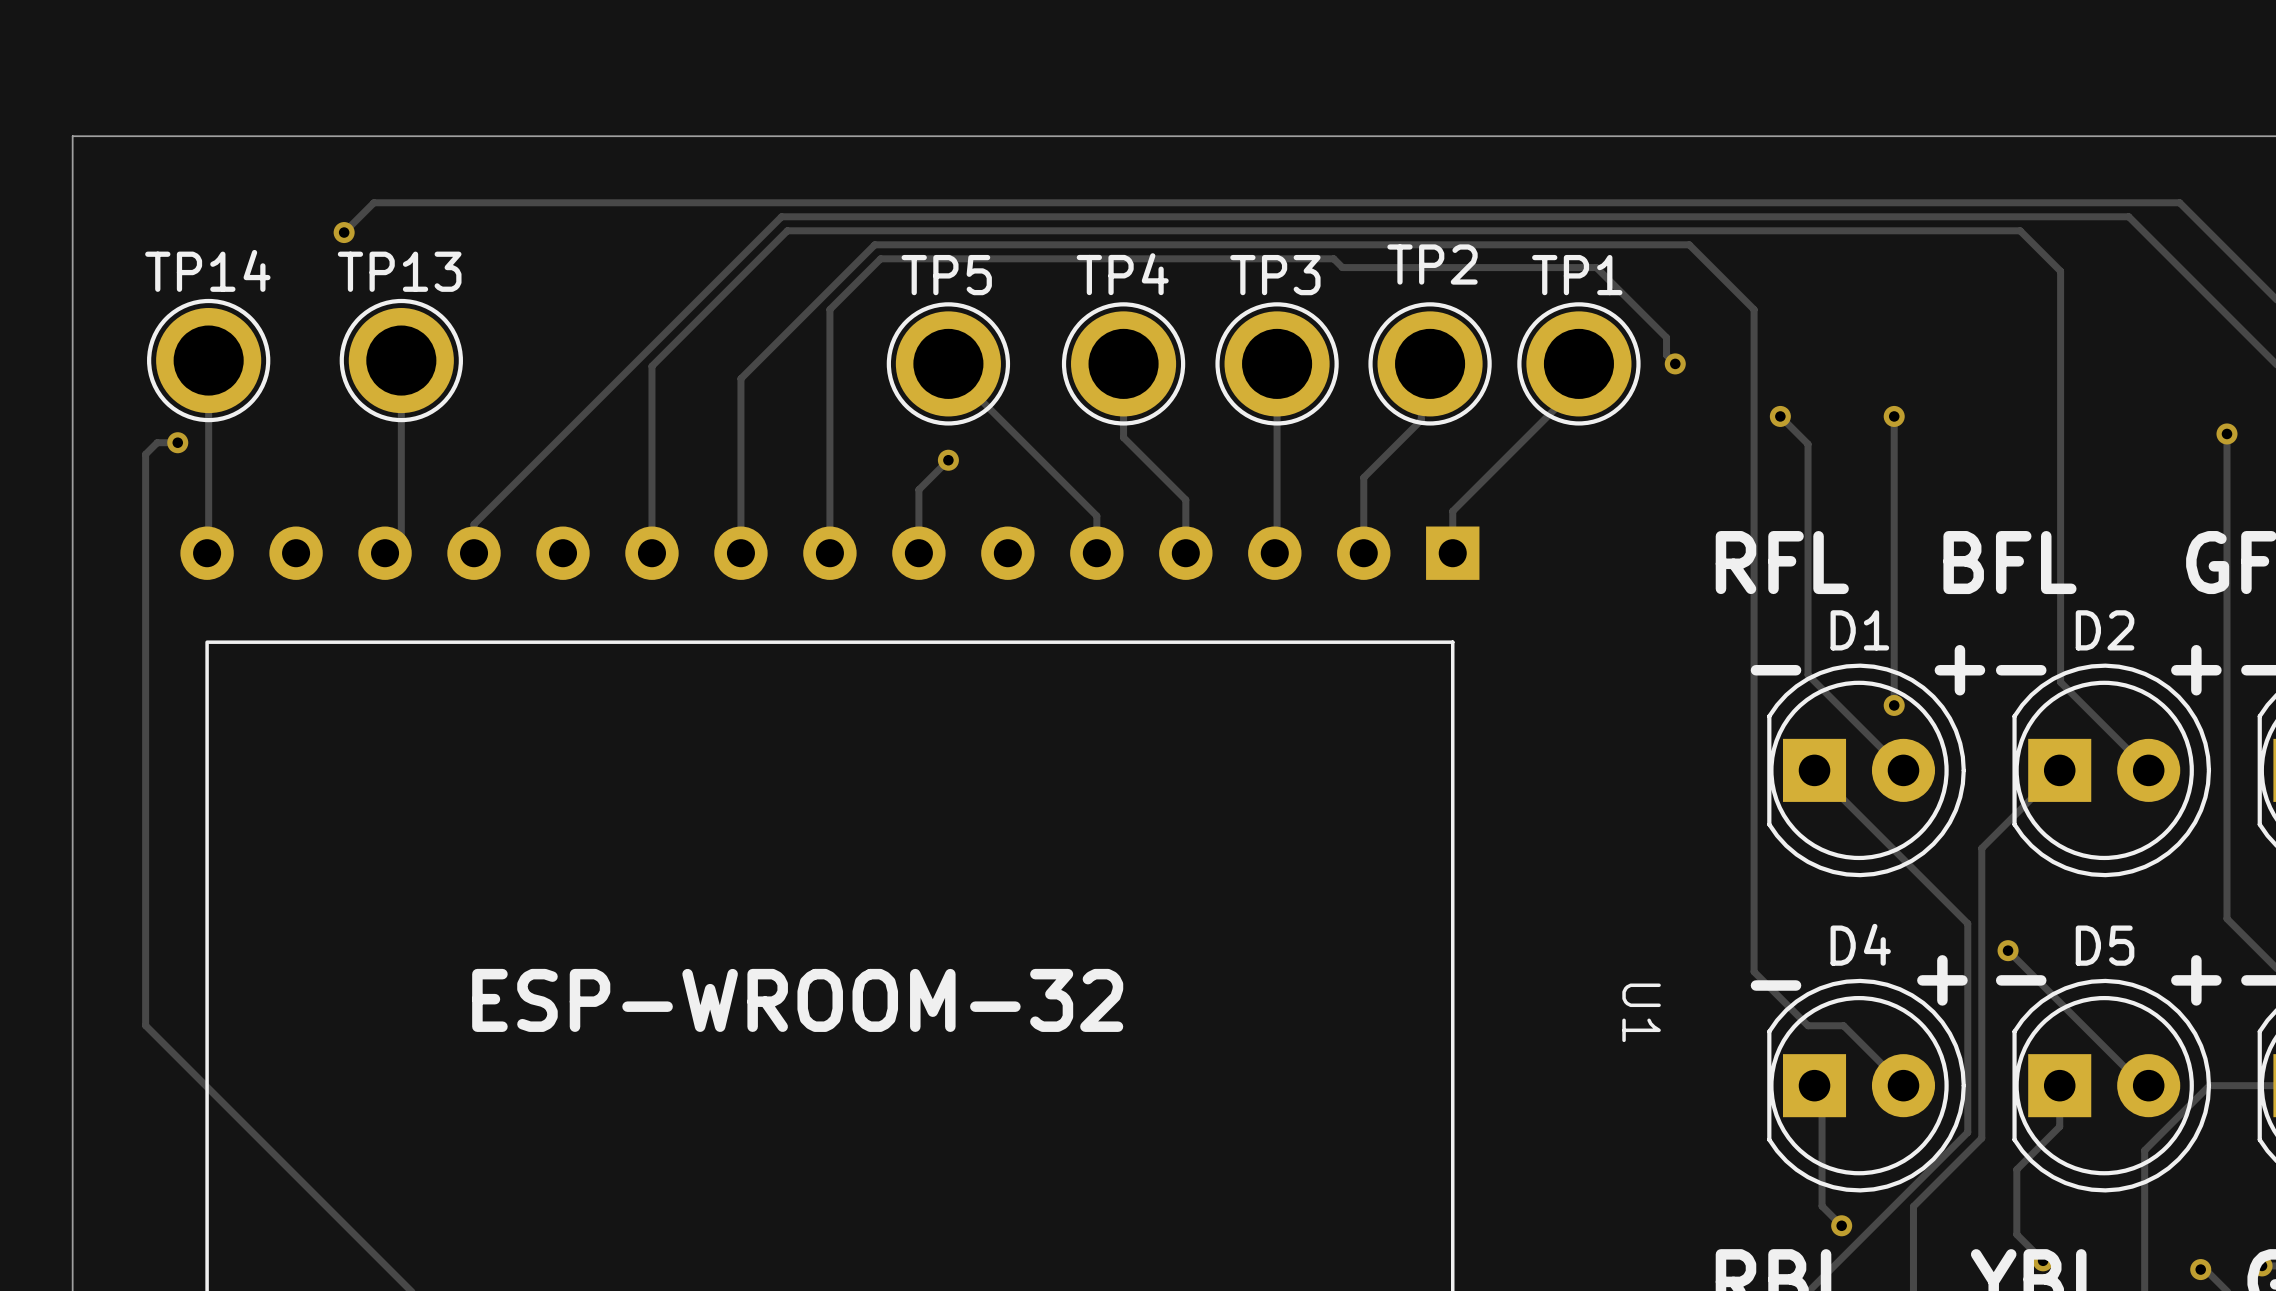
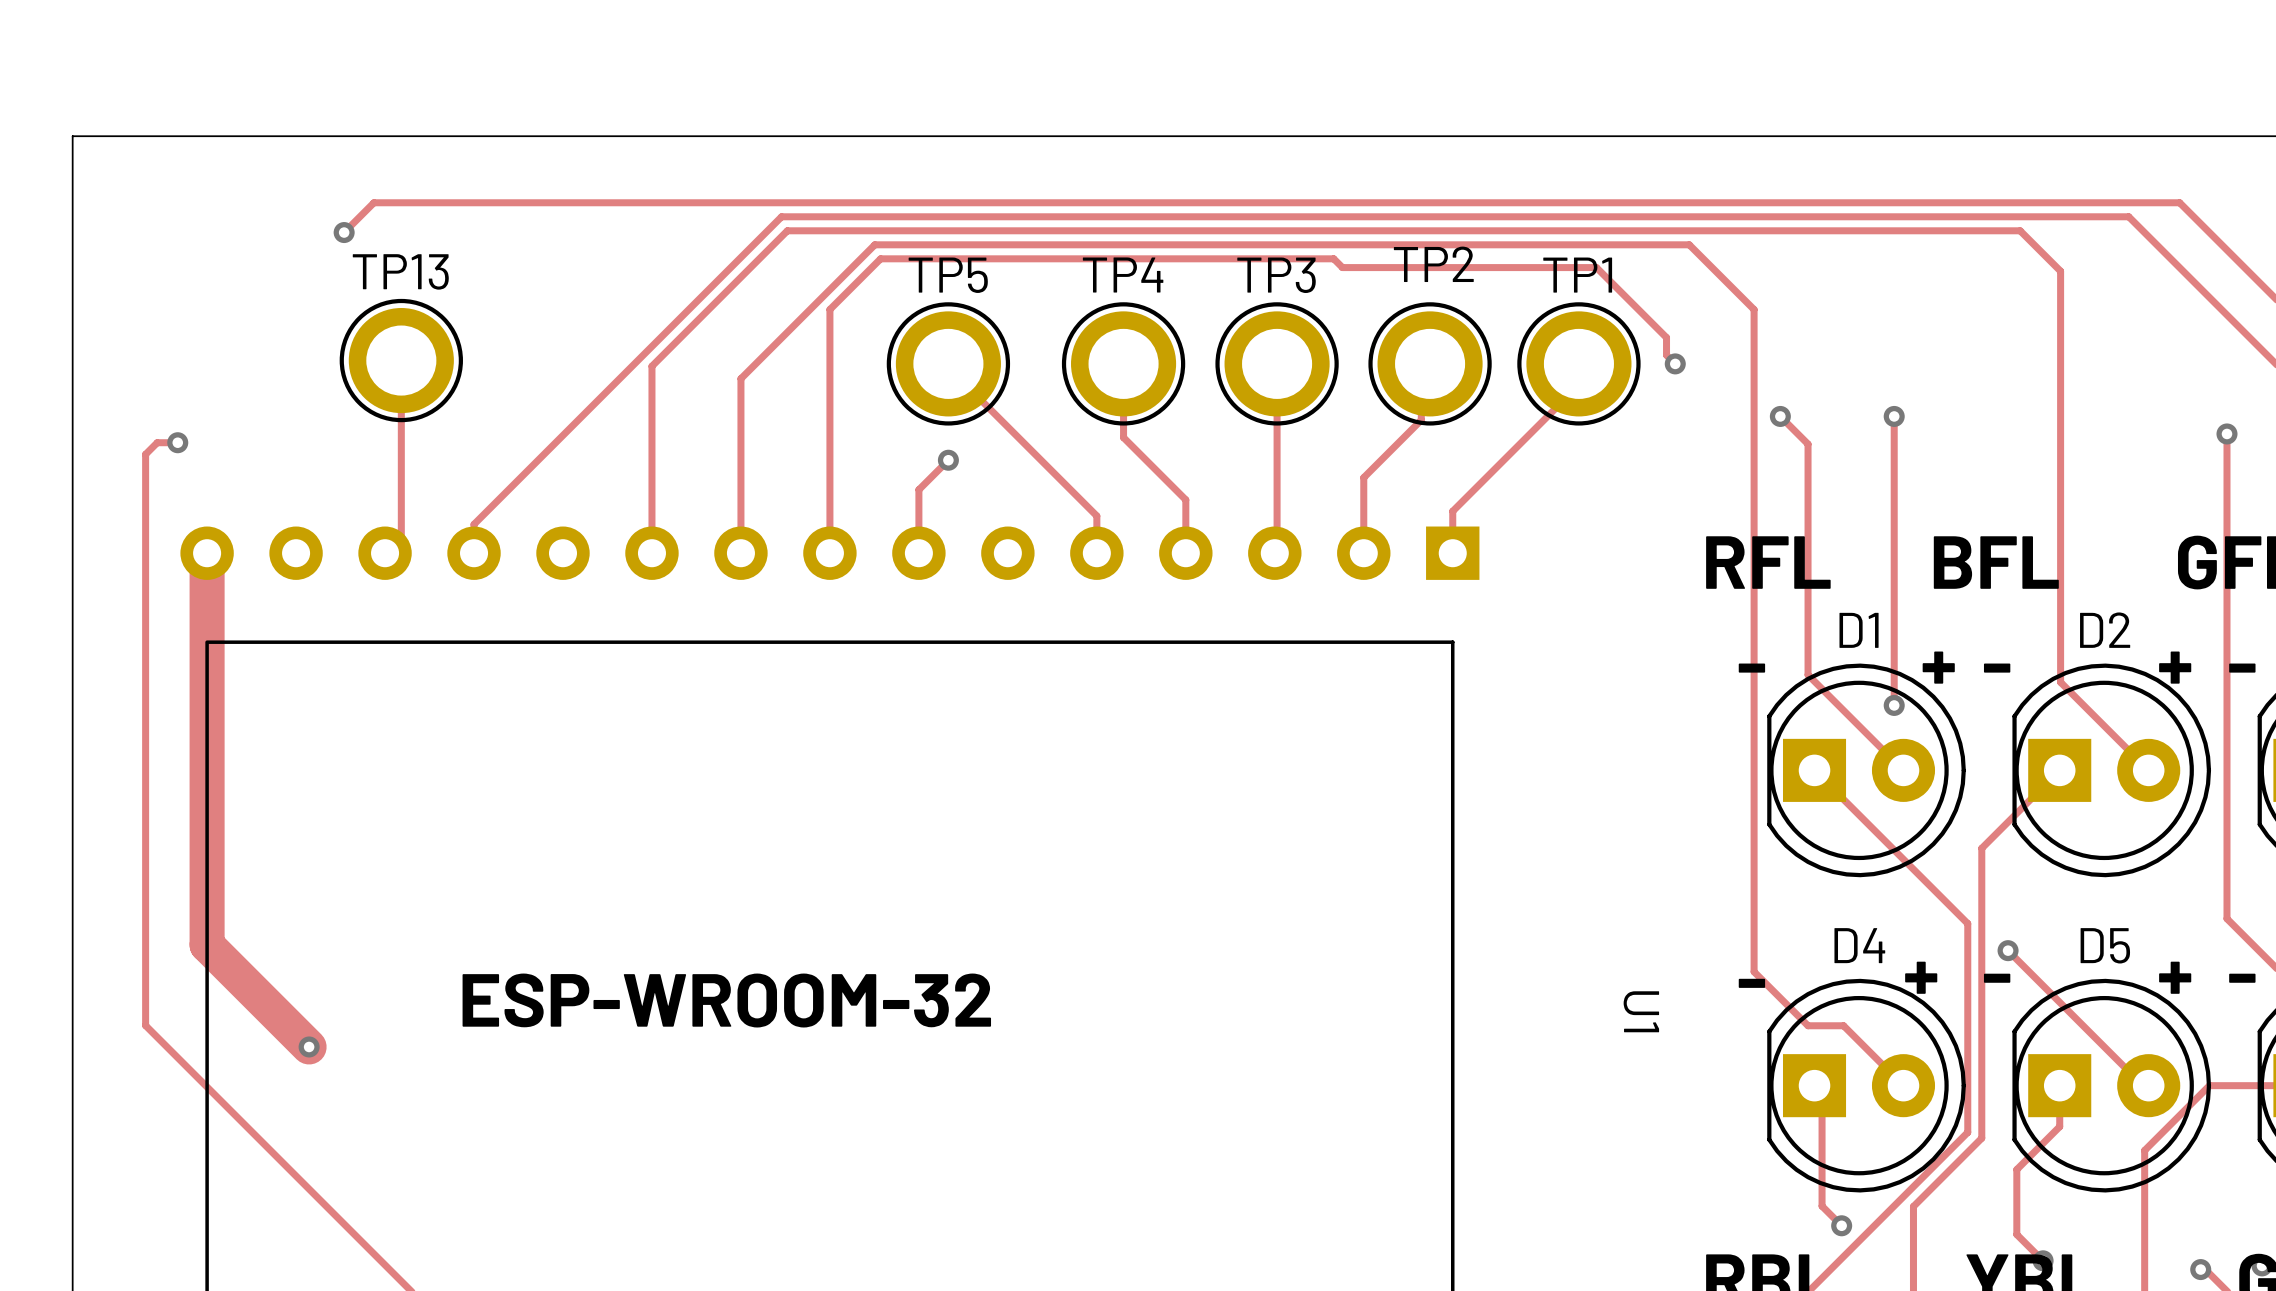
track: (208, 360) (208, 551) -> none
TP14: (208, 360) -> none
track: none -> (207, 553) (207, 944) (309, 1046)
via: none -> (309, 1046)

